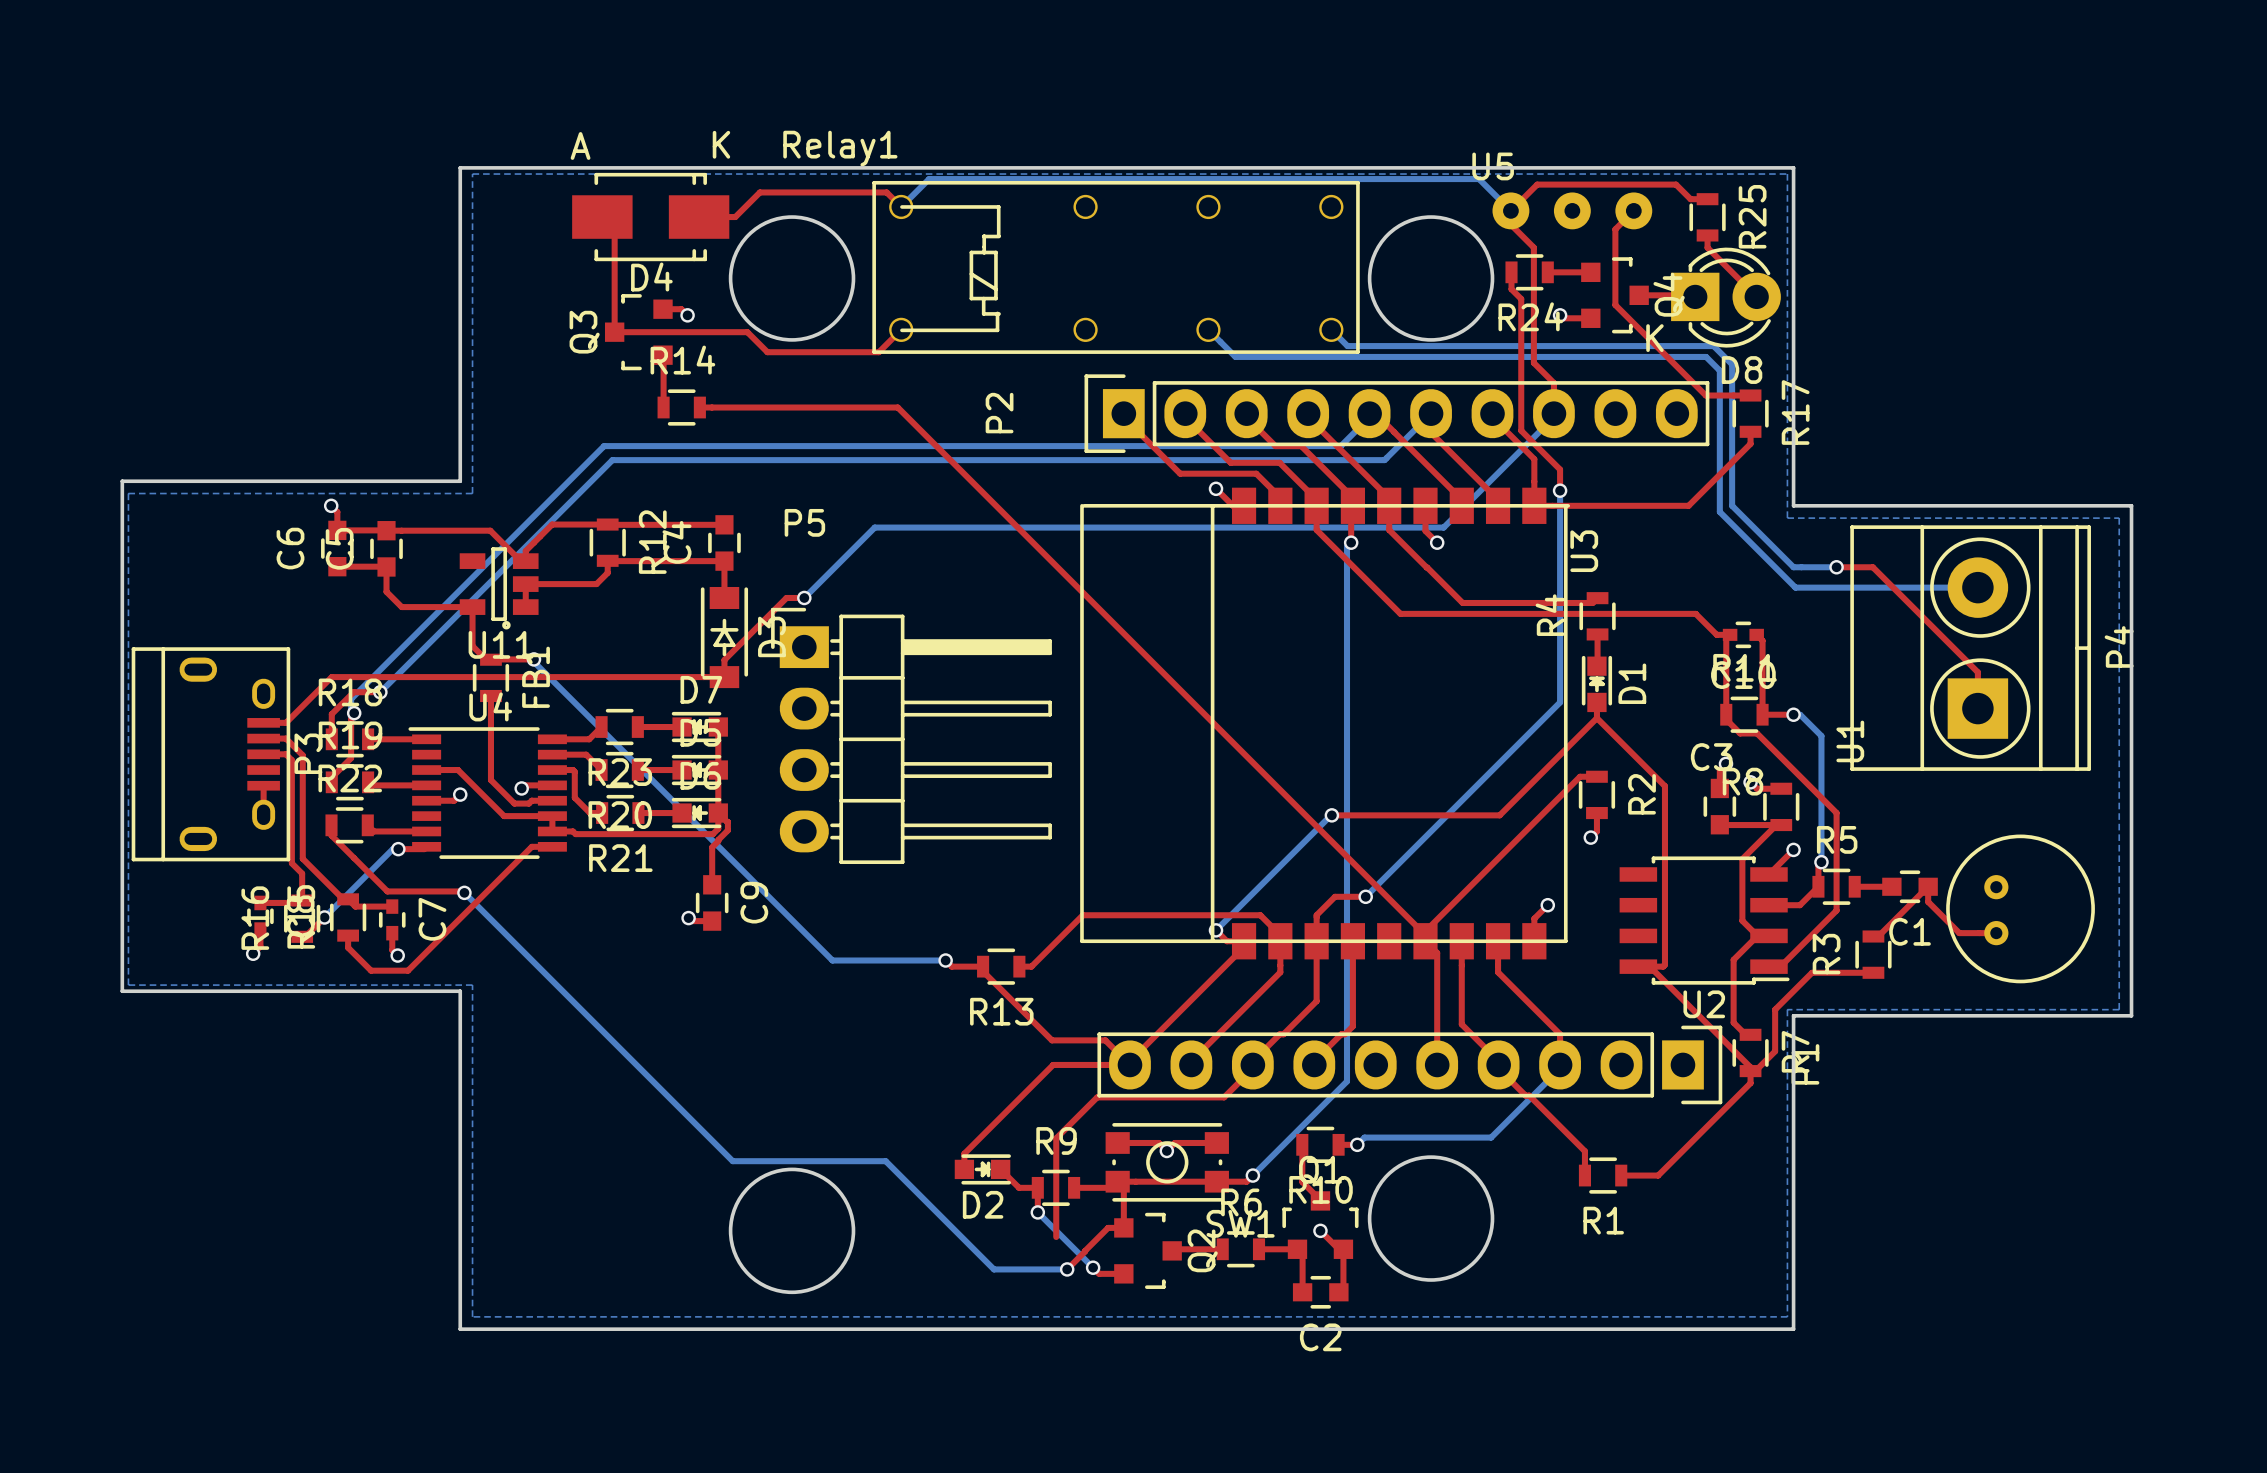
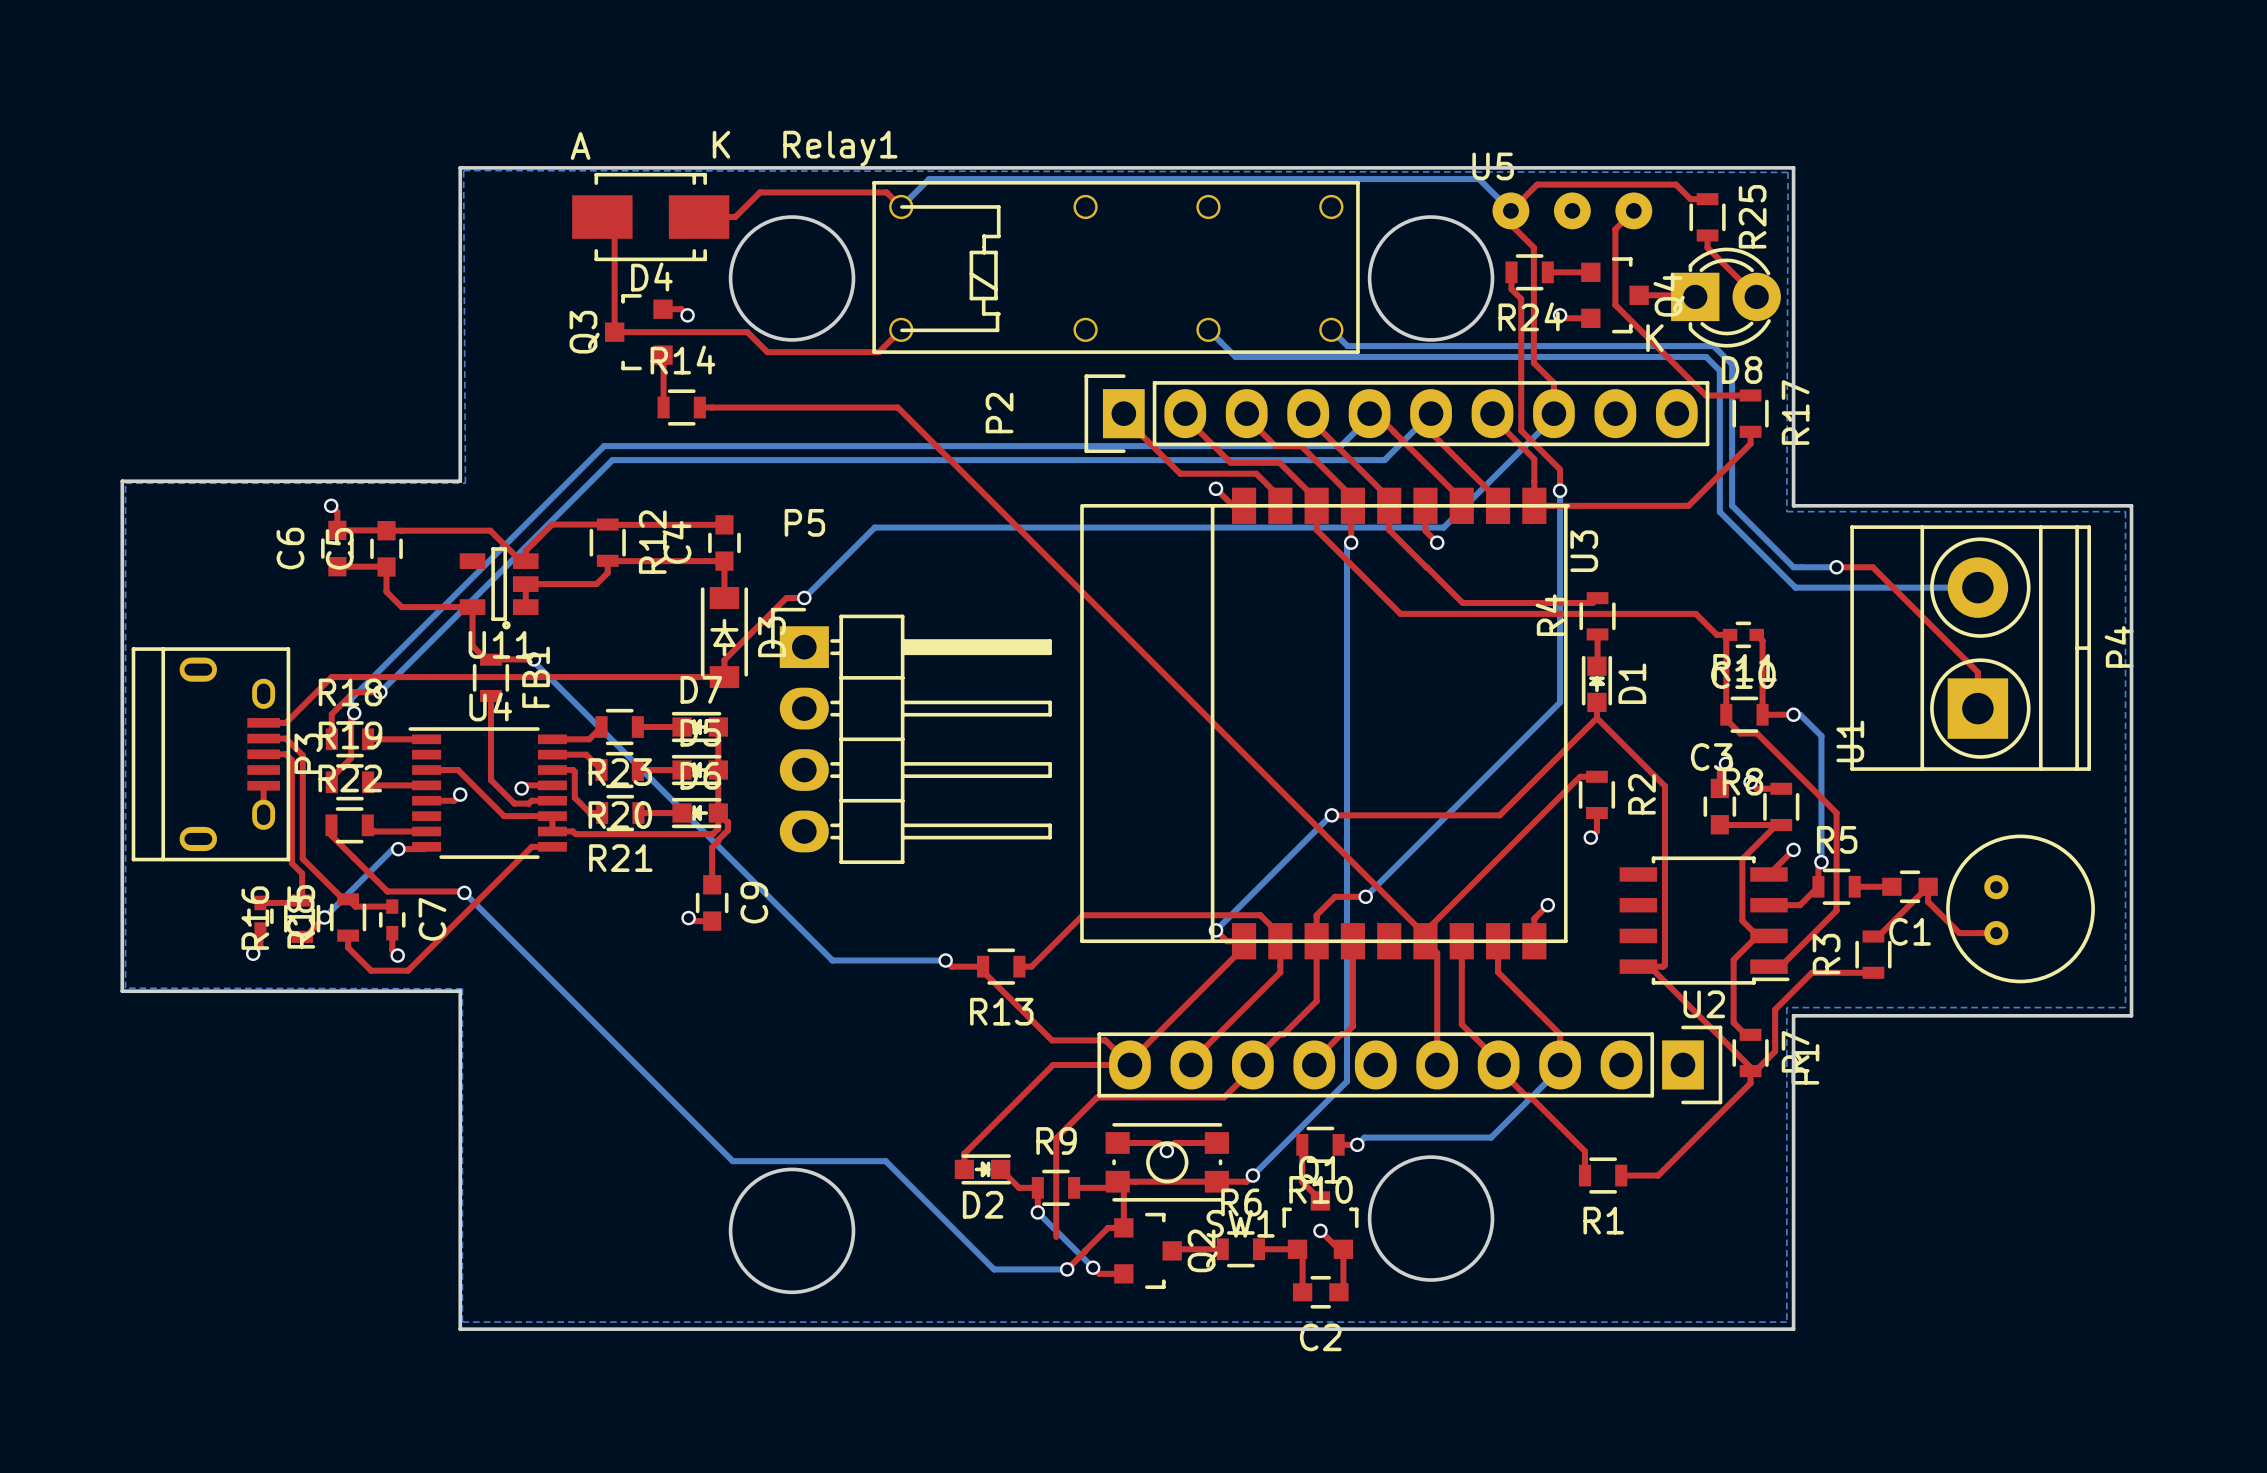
bottom zone outline: (472, 174) (472, 493) (128, 493) (128, 985) (472, 985) (472, 1316) (1787, 1316) (1787, 1009) (2119, 1009) (2119, 518) (1787, 518) (1787, 174) (472, 174) -> (463, 170) (465, 483) (125, 483) (125, 988) (462, 988) (462, 1322) (1786, 1322) (1786, 1007) (2125, 1007) (2125, 511) (1786, 511) (1788, 172) (463, 170)

